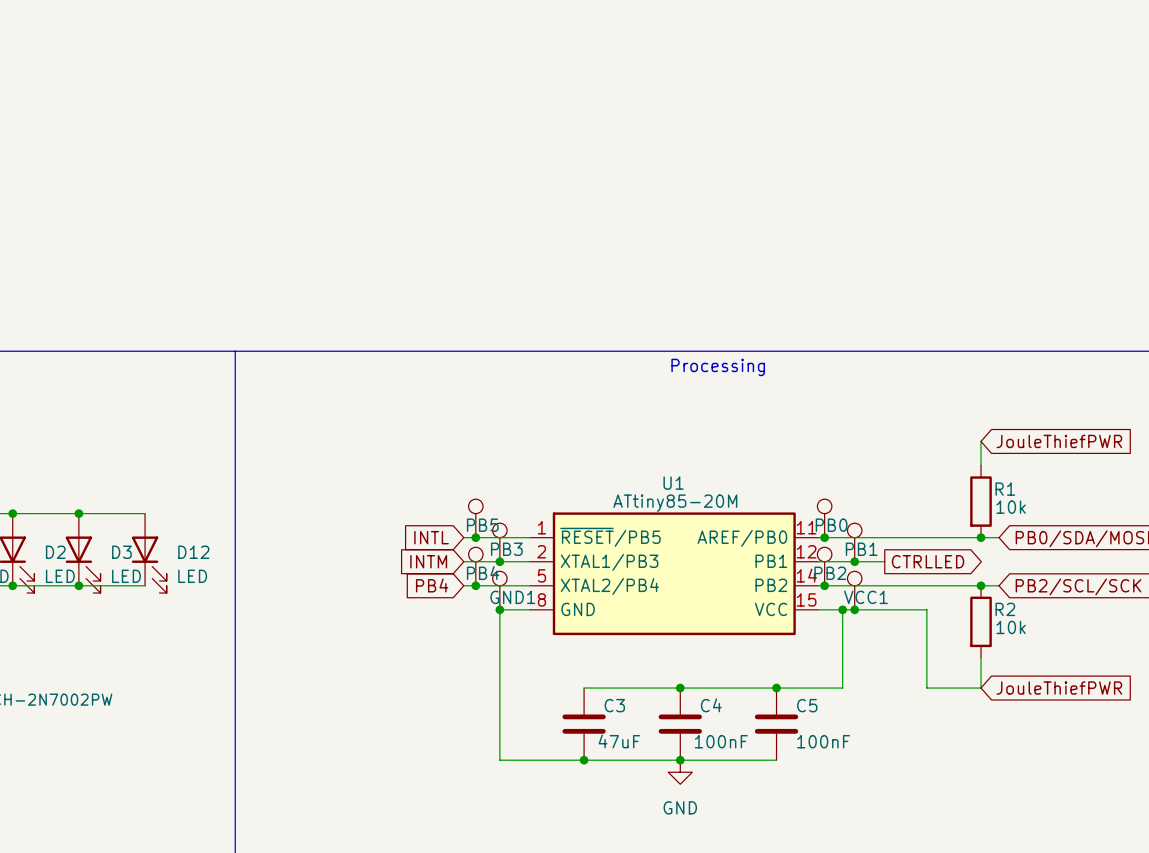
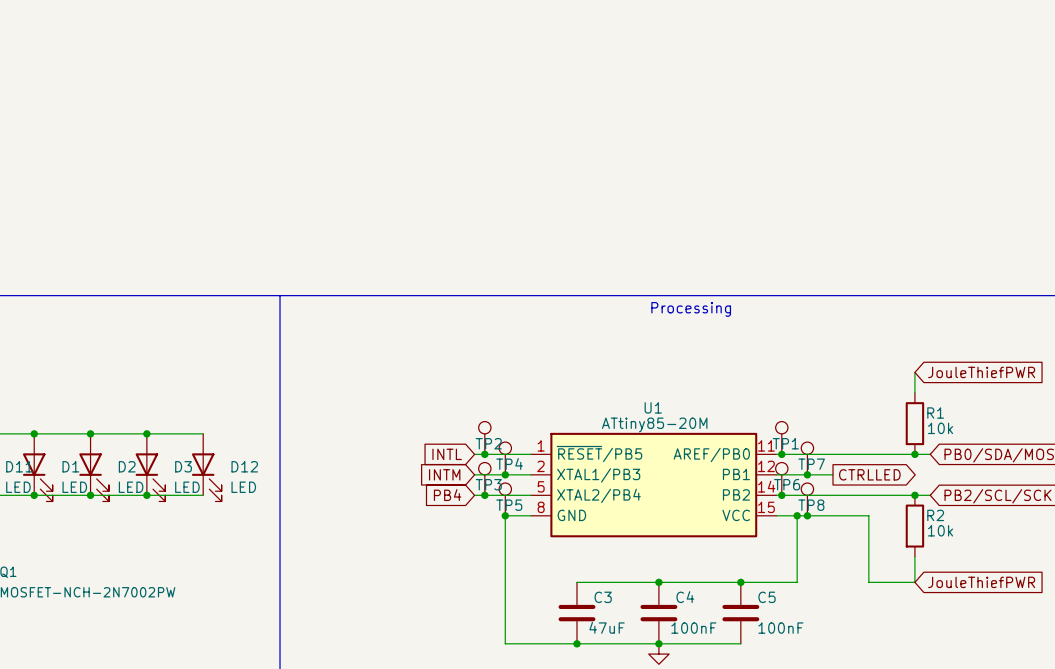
PB5 name: PB5 (482, 525) -> TP2 (488, 443)
PB0 name: PB0 (831, 525) -> TP1 (785, 443)
PB3 name: PB3 (506, 549) -> TP4 (509, 463)
PB1 name: PB1 (861, 549) -> TP7 (811, 464)
PB4 name: PB4 (483, 573) -> TP3 (488, 484)
PB2 name: PB2 (830, 573) -> TP6 (787, 484)
GND1 name: GND1 (512, 597) -> TP5 (509, 505)
VCC1 name: VCC1 (865, 597) -> TP8 (811, 505)

